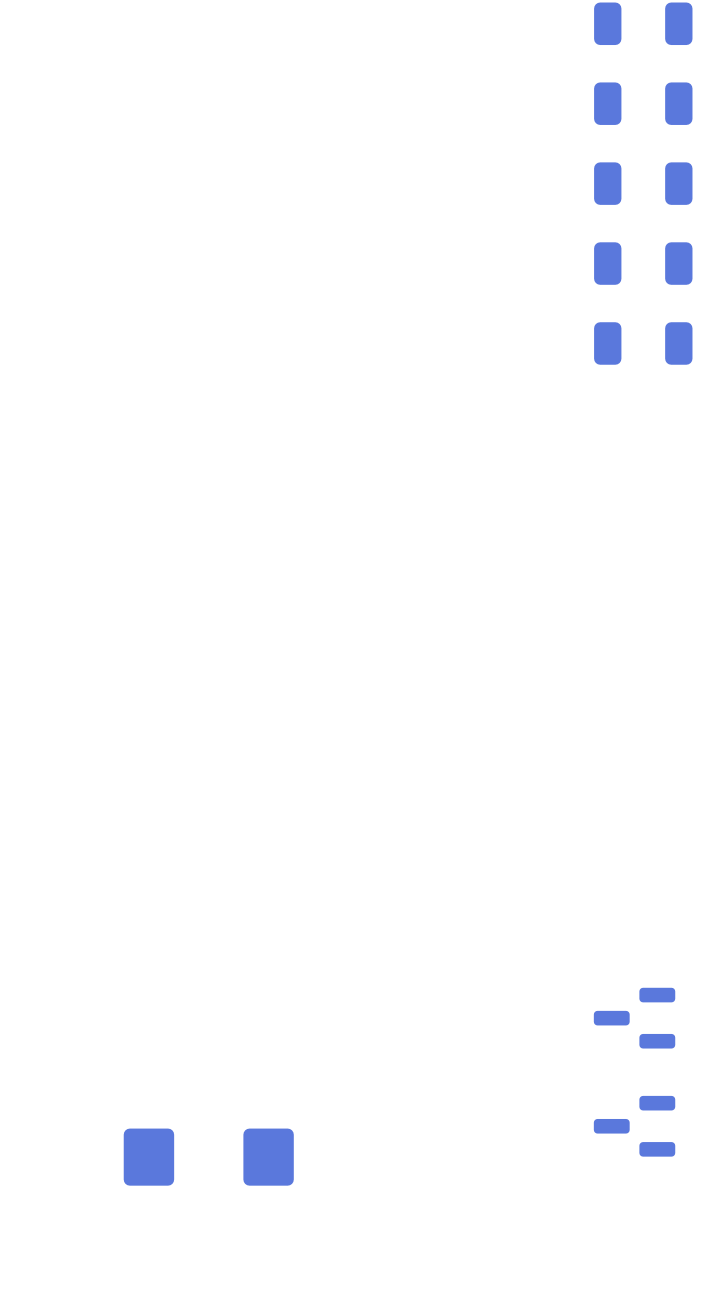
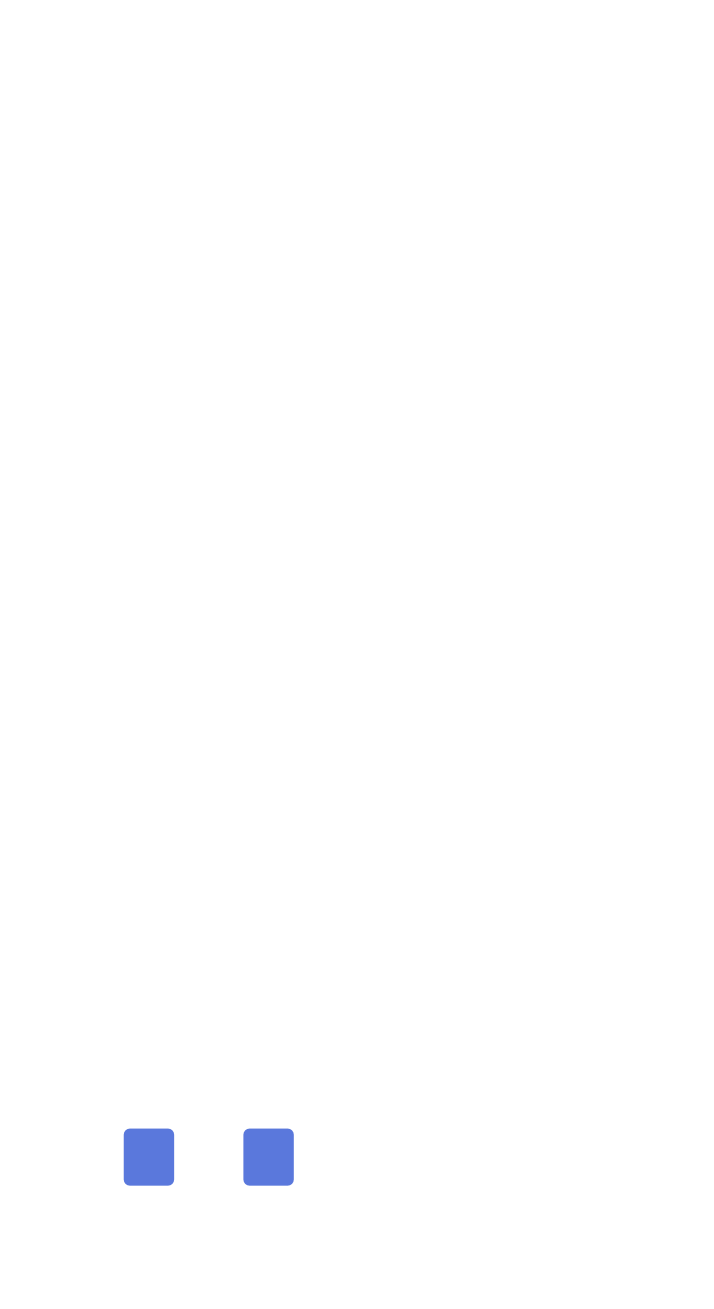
part: (643, 23) -> none
part: (643, 103) -> none
part: (643, 183) -> none
part: (643, 263) -> none
part: (643, 343) -> none
part: (634, 1018) -> none
part: (634, 1126) -> none

